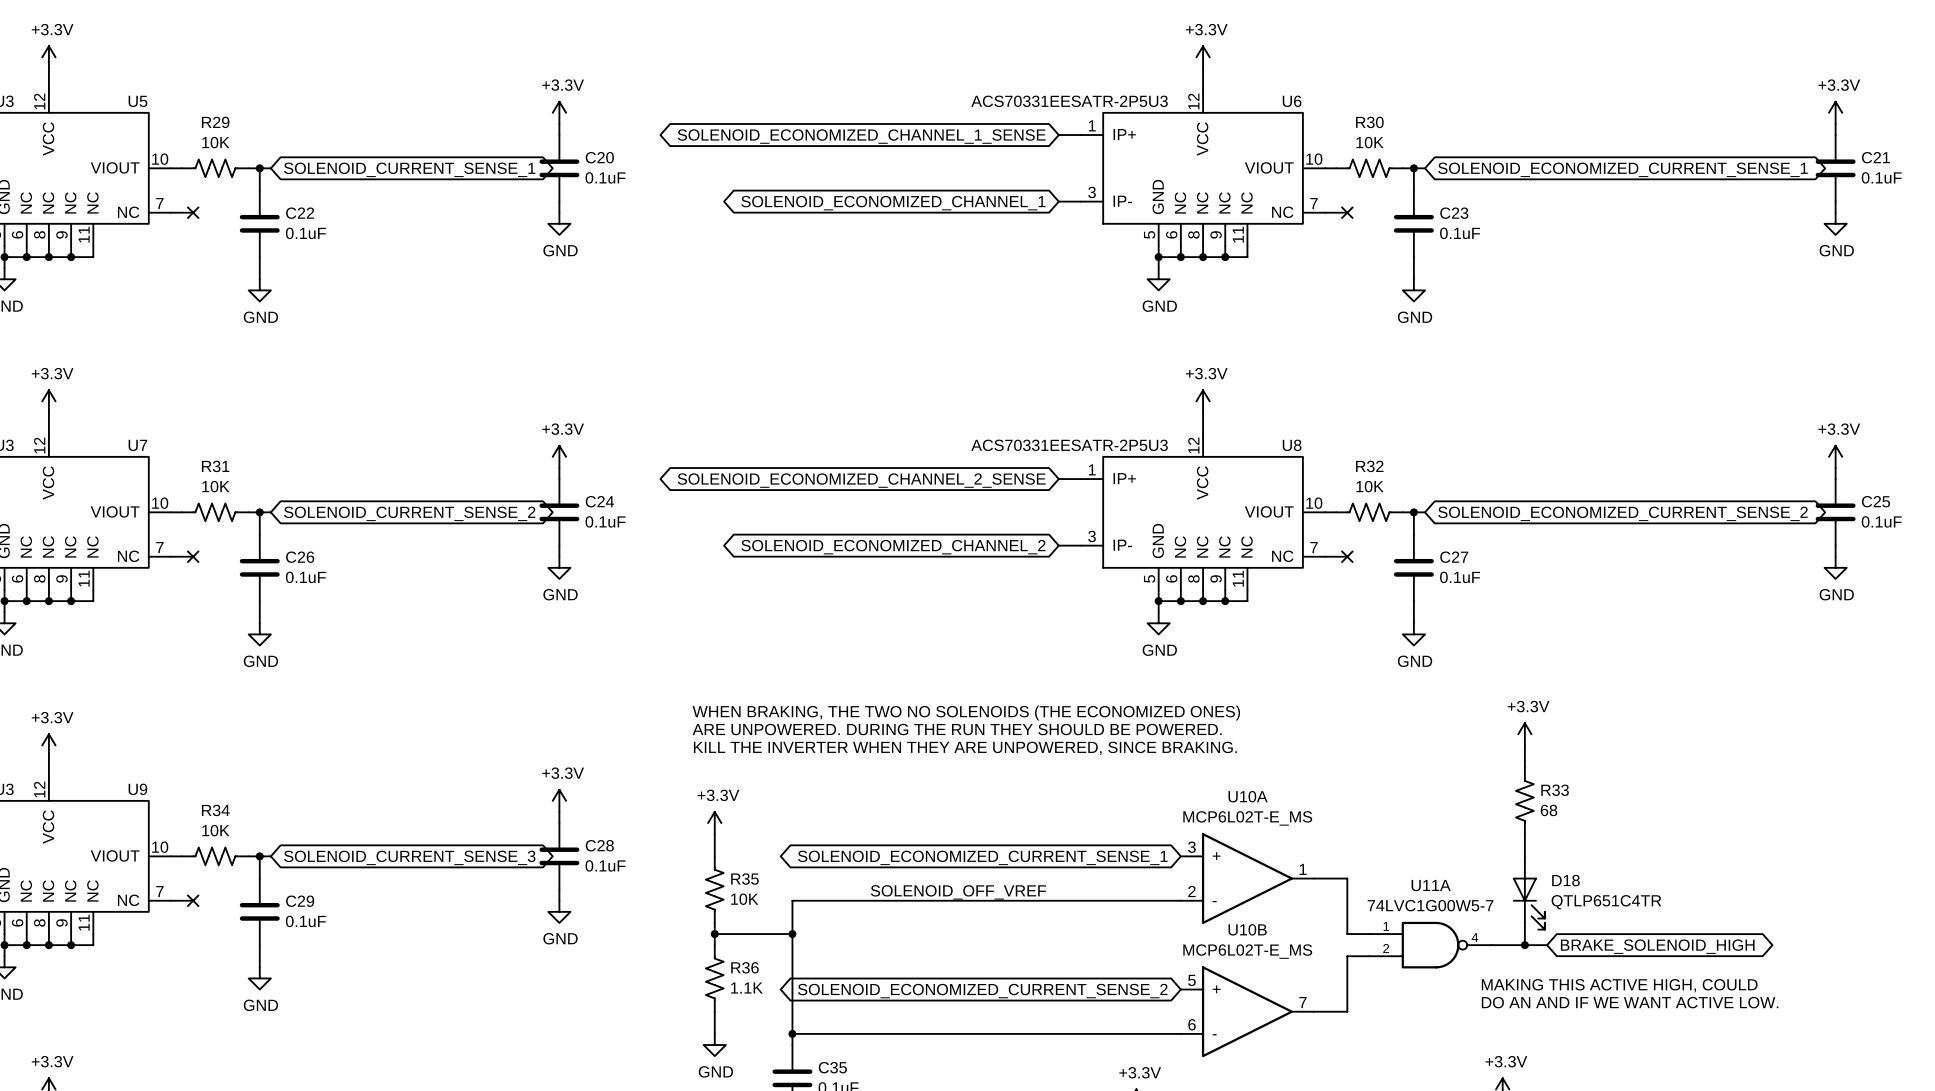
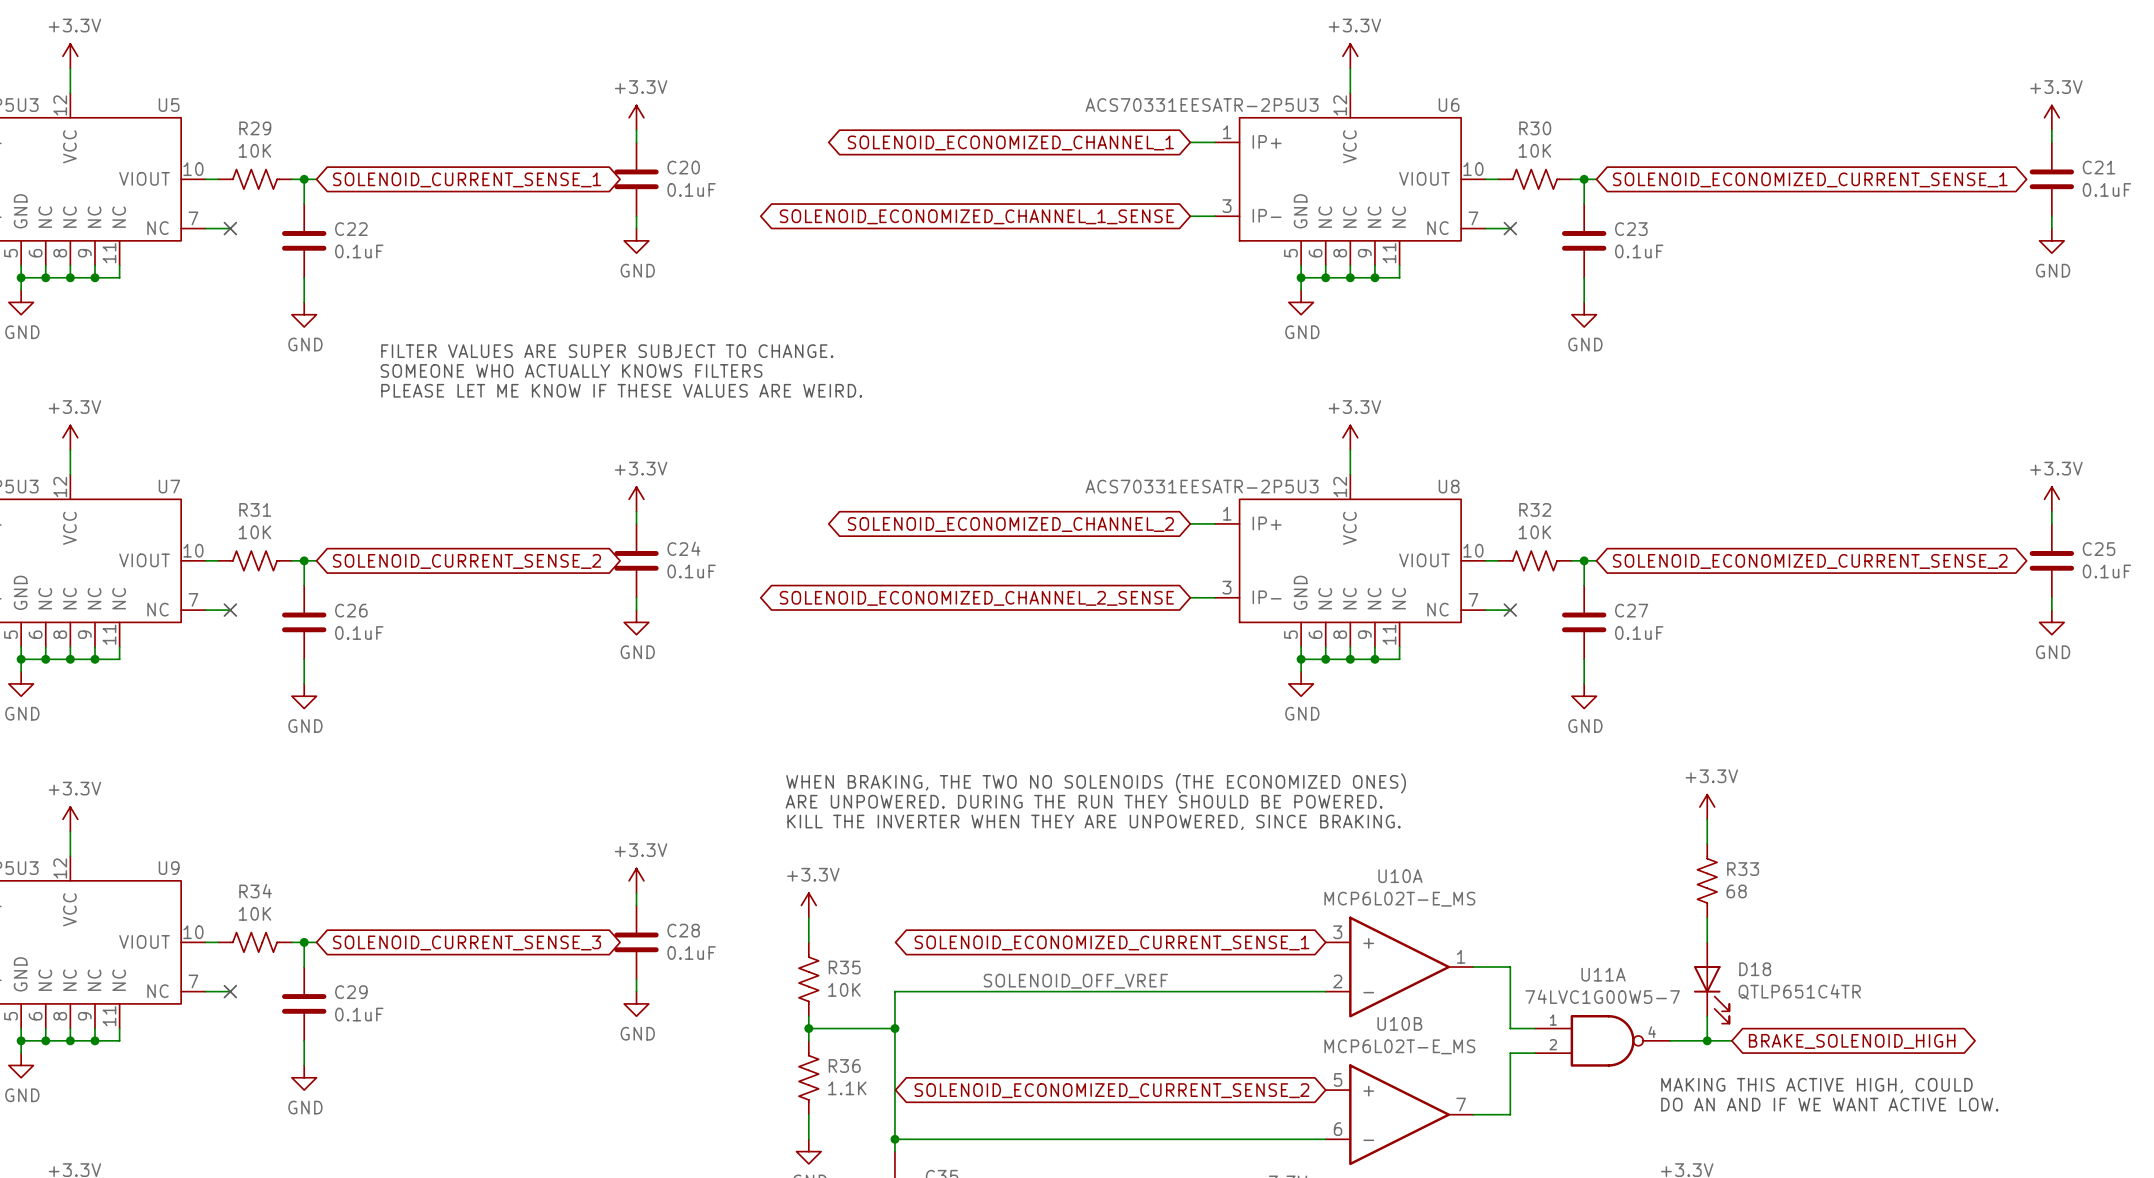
global label: SOLENOID_ECONOMIZED_CHANNEL_1_SENSE (861, 136) -> SOLENOID_ECONOMIZED_CHANNEL_1 (1010, 142)
global label: SOLENOID_ECONOMIZED_CHANNEL_1 (893, 203) -> SOLENOID_ECONOMIZED_CHANNEL_1_SENSE (976, 216)
text: none -> FILTER VALUES ARE SUPER SUBJECT TO CHANGE. (607, 351)
text: none -> SOMEONE WHO ACTUALLY KNOWS FILTERS (571, 370)
text: none -> PLEASE LET ME KNOW IF THESE VALUES ARE WEIRD. (621, 390)
global label: SOLENOID_ECONOMIZED_CHANNEL_2_SENSE (861, 480) -> SOLENOID_ECONOMIZED_CHANNEL_2 (1010, 524)
global label: SOLENOID_ECONOMIZED_CHANNEL_2 (893, 547) -> SOLENOID_ECONOMIZED_CHANNEL_2_SENSE (976, 598)

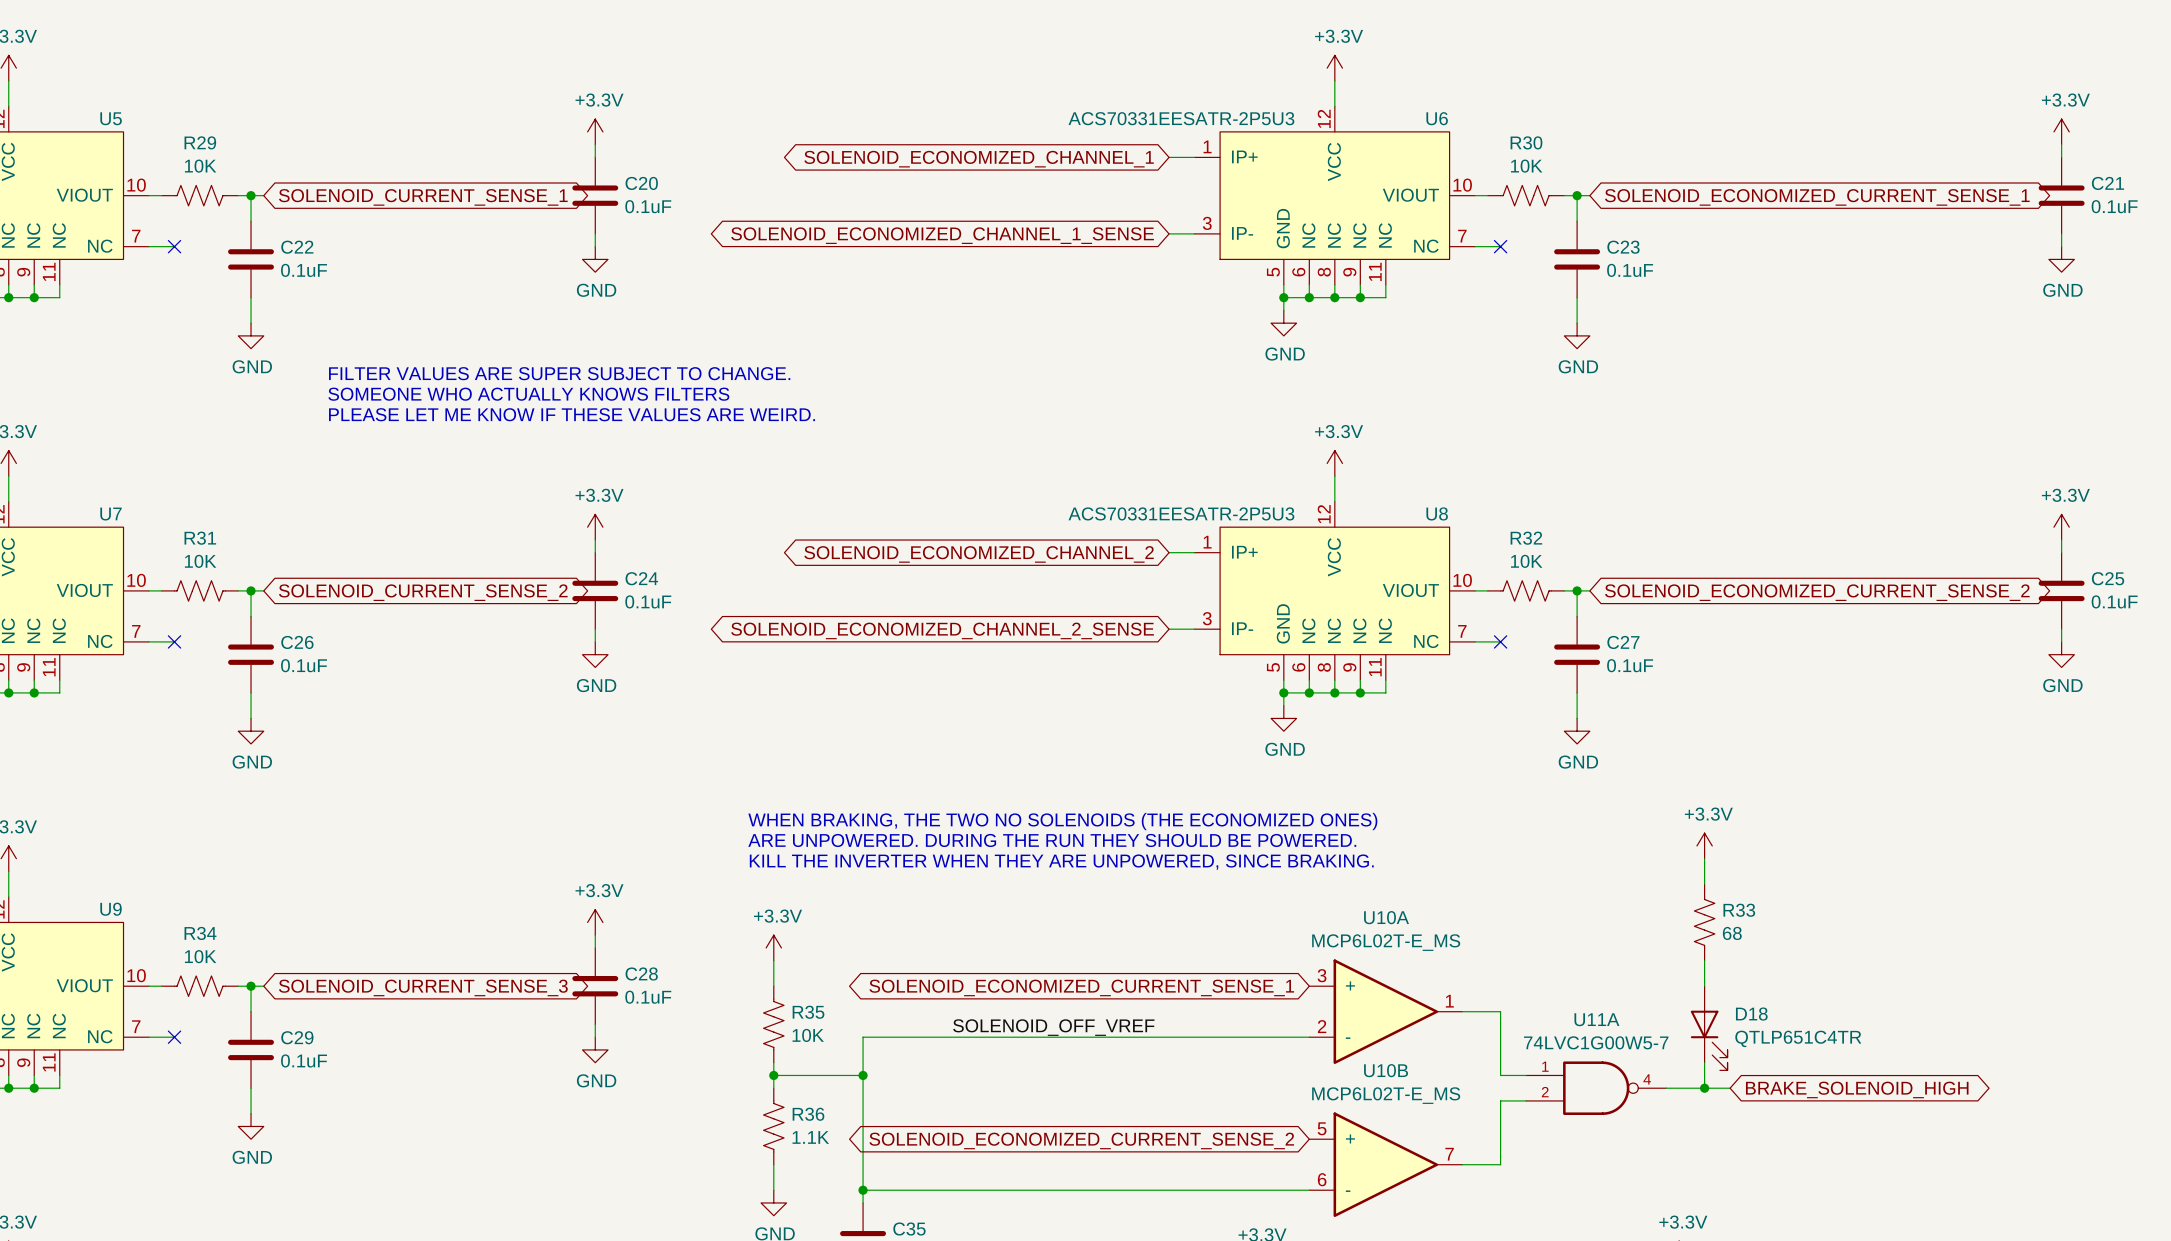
text: MAKING THIS ACTIVE HIGH, COULD (1816, 1085) -> none
text: DO AN AND IF WE WANT ACTIVE LOW. (1829, 1104) -> none

